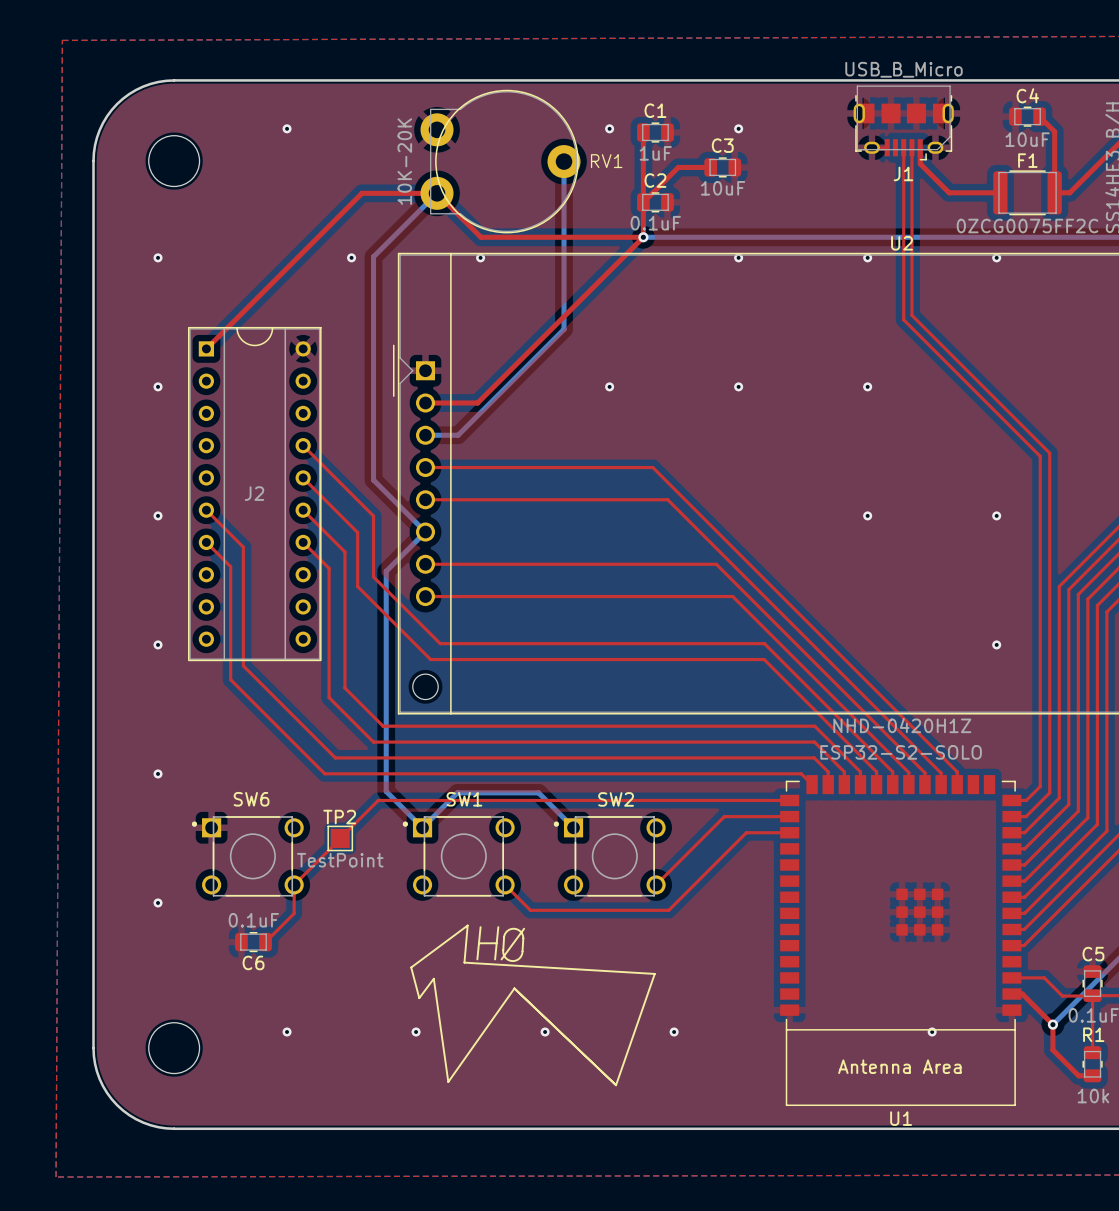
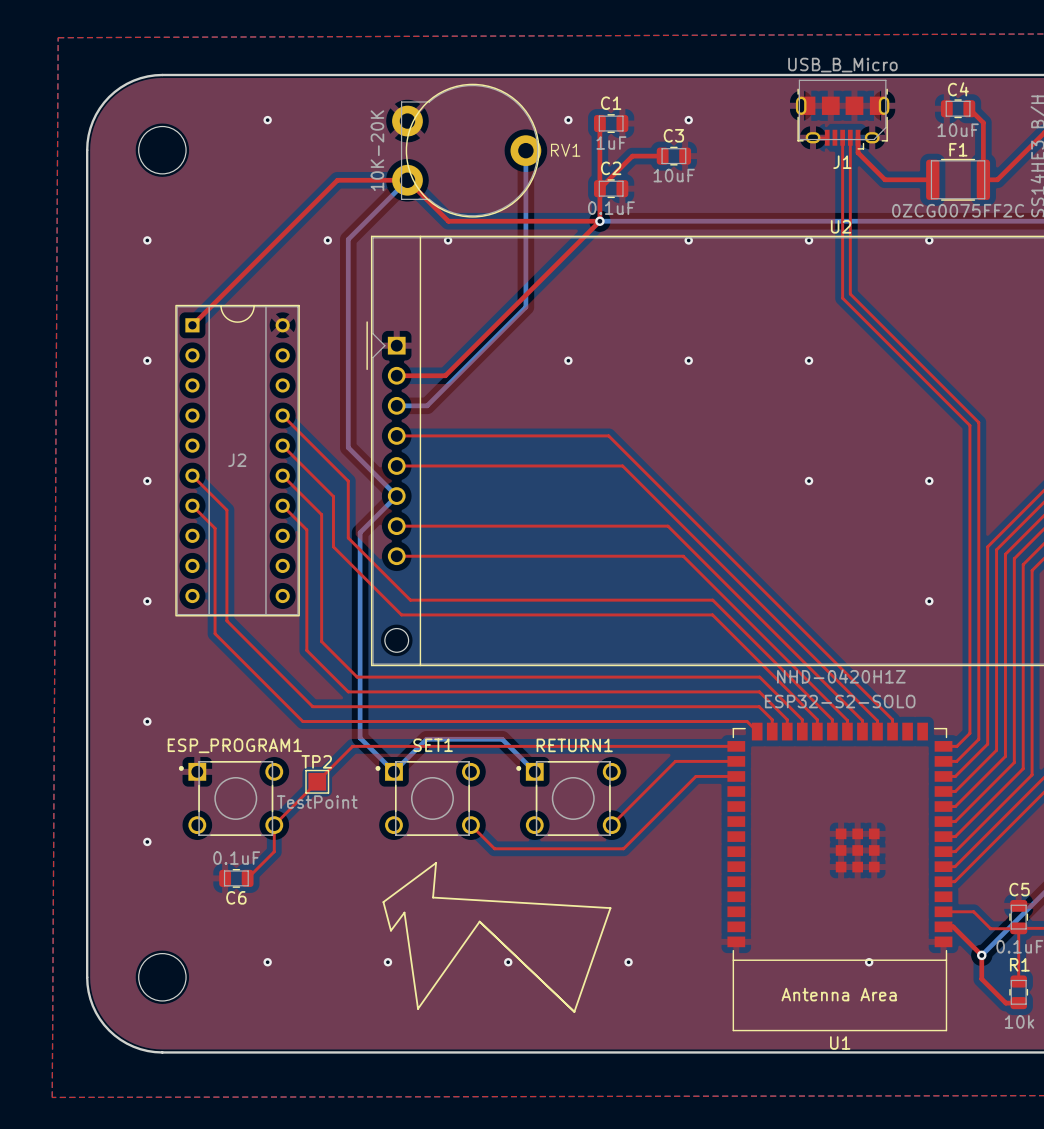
SW6 name: SW6 (251, 799) -> ESP_PROGRAM1 (234, 745)
SW1 name: SW1 (464, 799) -> SET1 (433, 745)
SW2 name: SW2 (616, 799) -> RETURN1 (574, 745)
line: (480, 927) (477, 959) -> none
line: (498, 927) (495, 959) -> none
line: (524, 928) (501, 959) -> none
line: (504, 936) (504, 956) (510, 960) (517, 959) (522, 952) (522, 933) (517, 929) (512, 928) (506, 931) (504, 936) -> none
line: (478, 943) (496, 943) -> none

